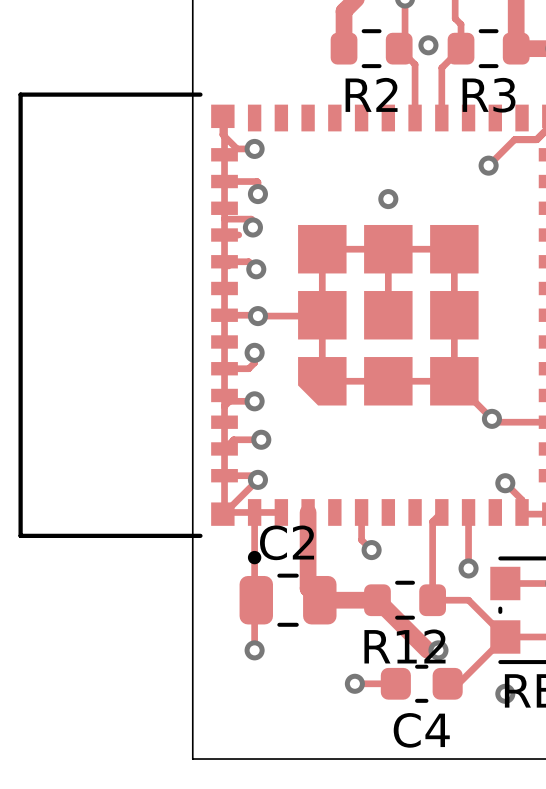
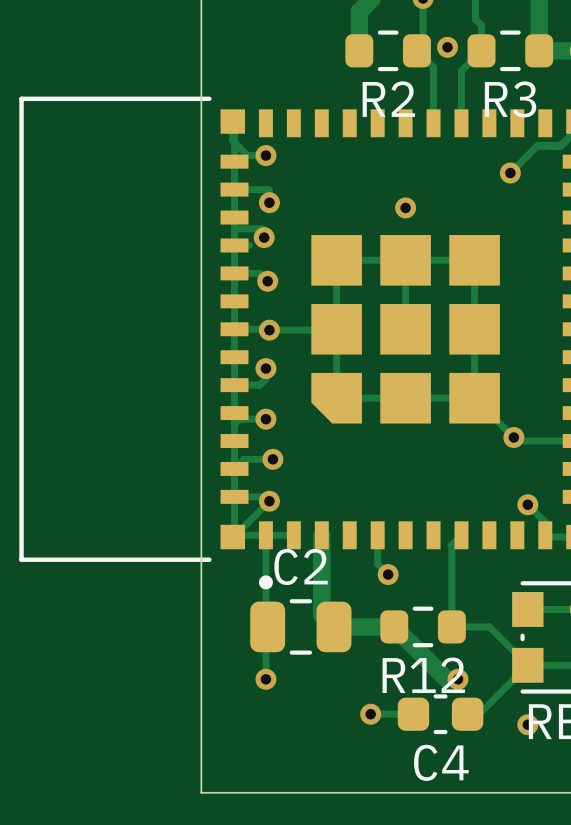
track: (468, 512) (468, 568) -> none
via: (468, 568) -> none

